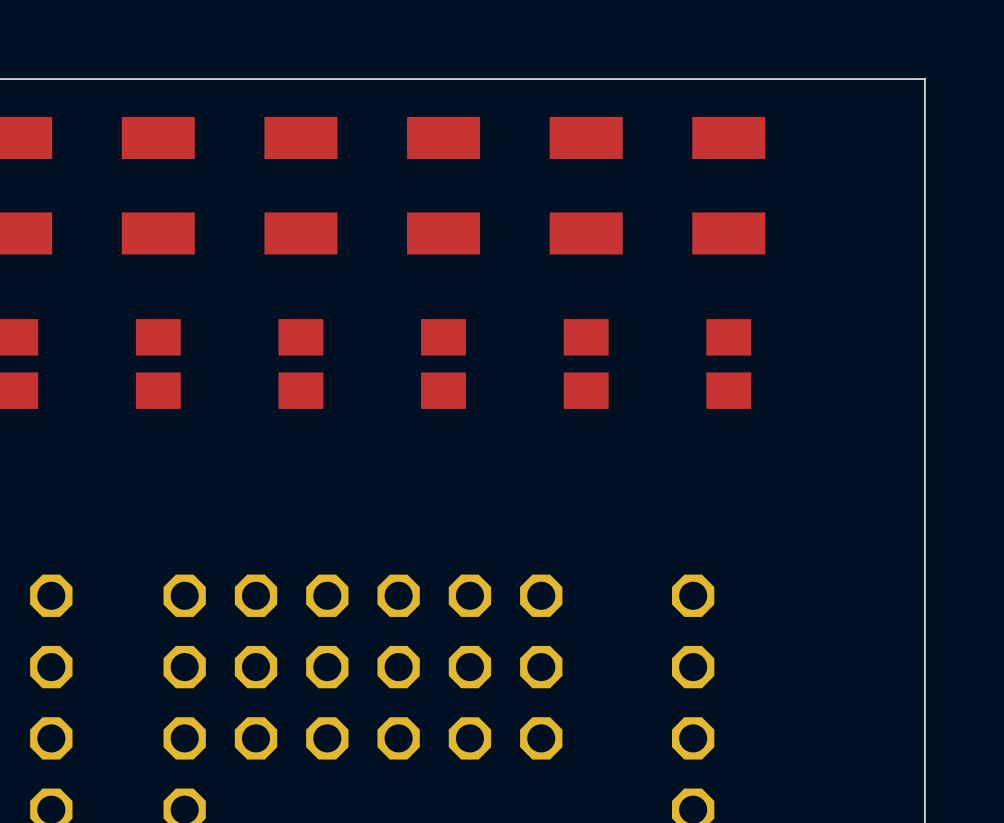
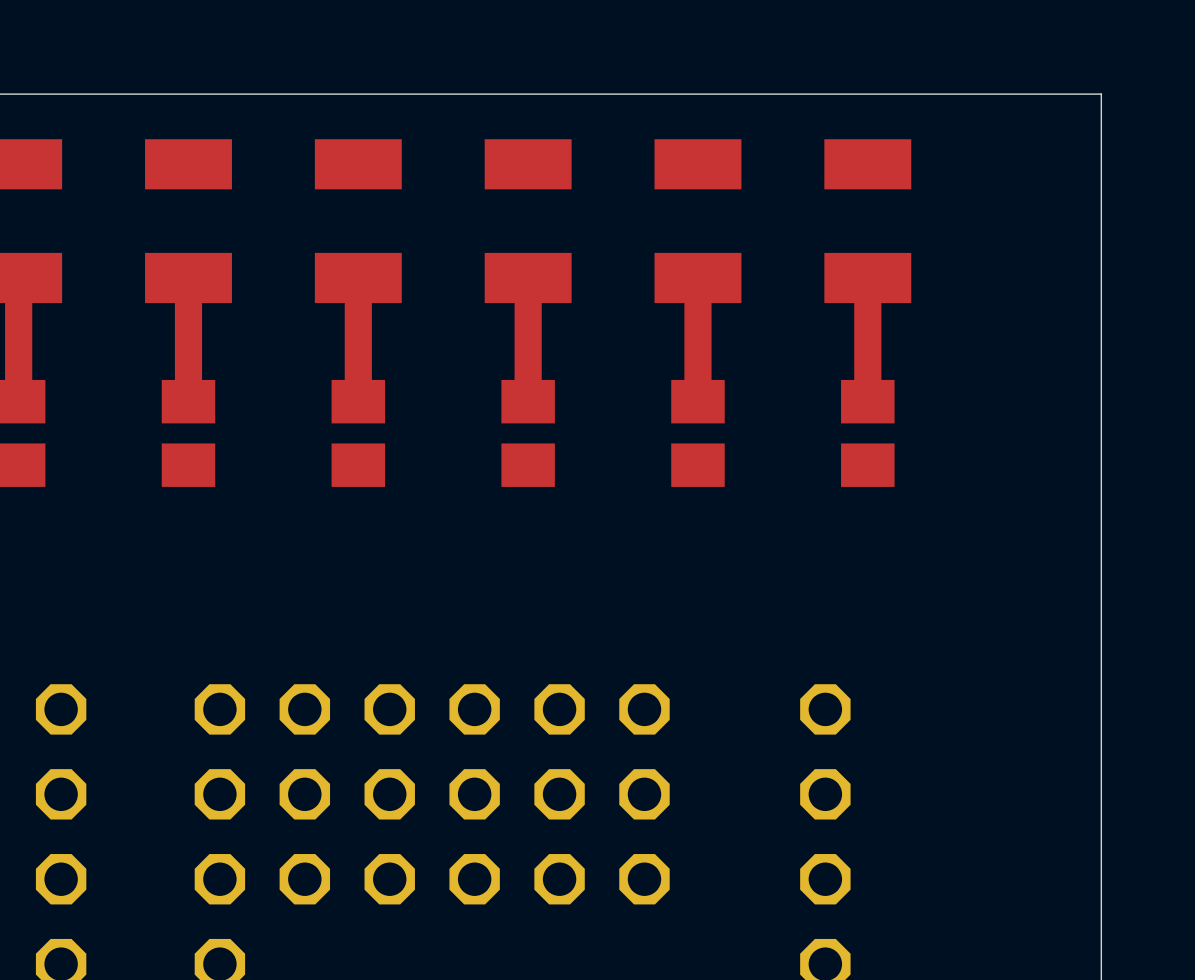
top track: none -> (18, 277) (18, 401)
top track: none -> (188, 277) (188, 401)
top track: none -> (358, 277) (358, 401)
top track: none -> (528, 277) (528, 401)
top track: none -> (697, 277) (697, 401)
top track: none -> (867, 277) (867, 401)

